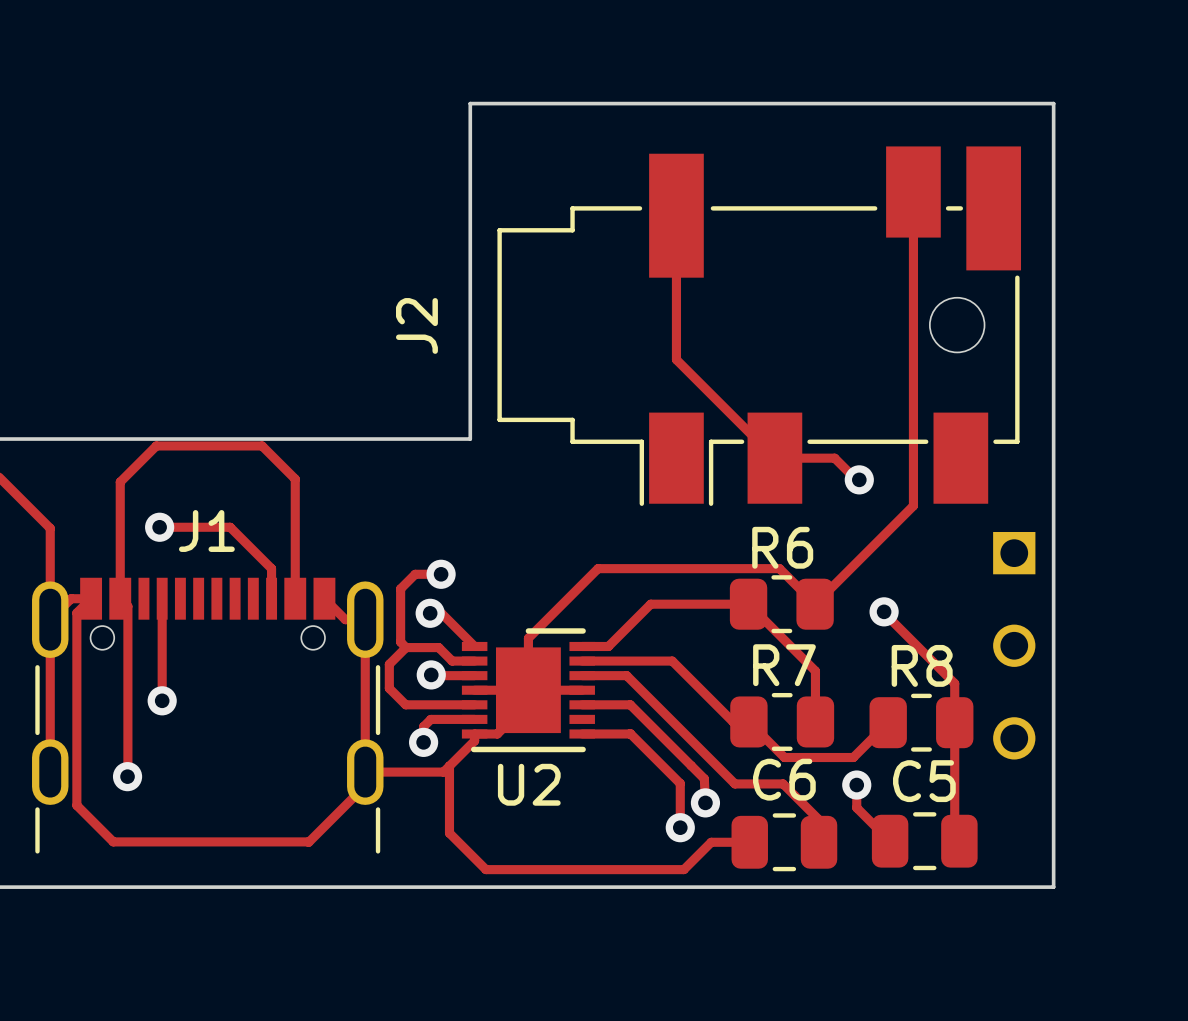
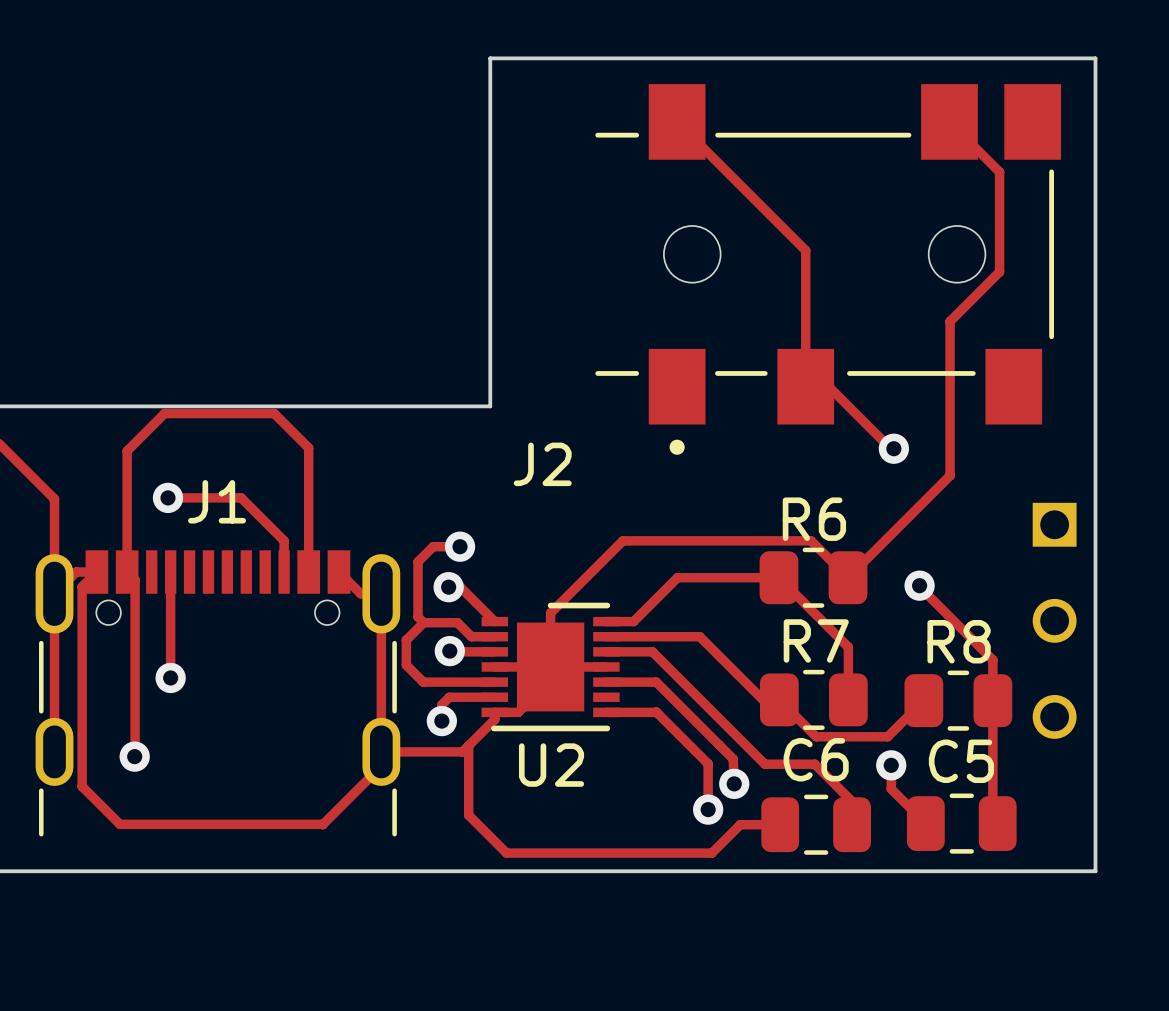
J2 footprint: [497, 146, 1022, 506] -> [595, 84, 1062, 455]
track: (913, 192) (913, 357) -> (949, 121) (999, 172) (999, 271) (950, 321)
track: (676, 215) (676, 359) (774, 458) (834, 458) -> (677, 121) (805, 250) (805, 386) (828, 386) (868, 426)
J2 name position: J2 (416, 325) -> J2 (542, 464)

